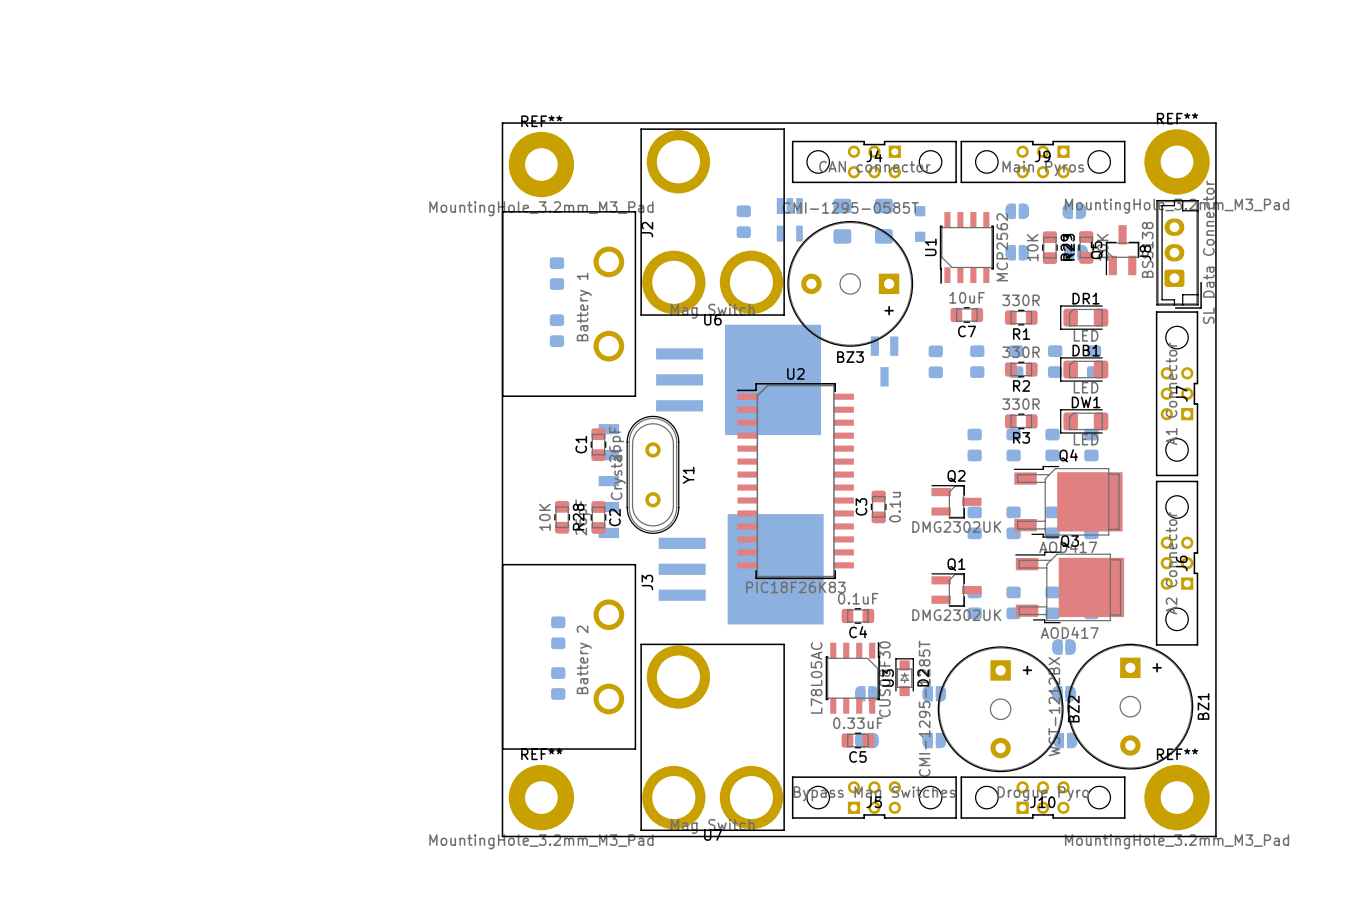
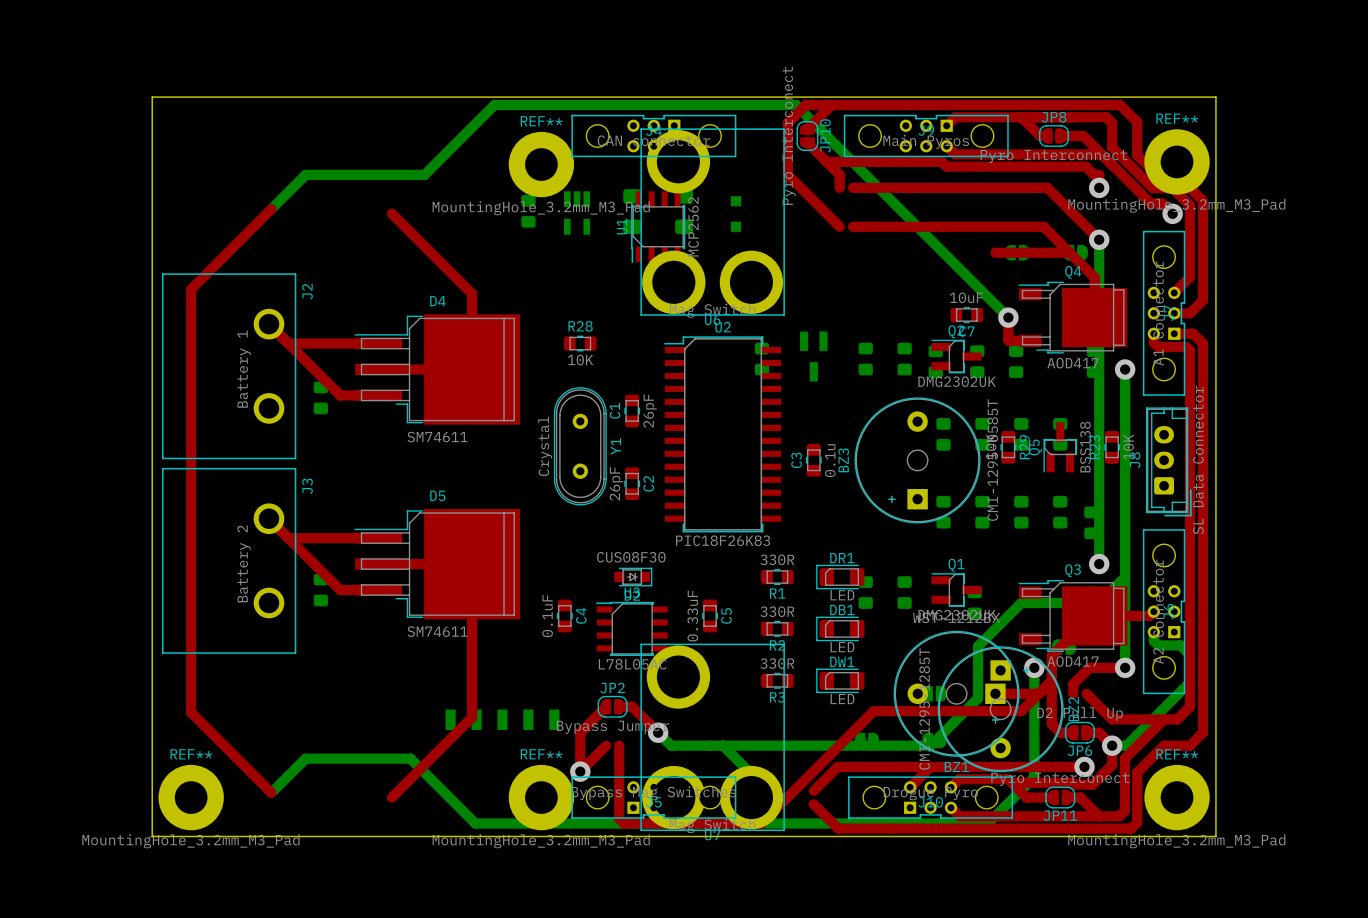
top track: none -> (831, 105) (807, 129)
top track: none -> (1021, 117) (1040, 136) (1047, 136)
board edge: (1215, 123) (502, 123) (502, 836) -> (1215, 123) (1215, 97) (152, 97) (152, 836) (502, 836)
top track: none -> (946, 125) (955, 117) (1106, 117) (1112, 123) (1112, 147) (1152, 188) (1172, 188) (1190, 205) (1190, 277) (1174, 292)
top track: none -> (1060, 136) (1083, 136) (1151, 203) (1162, 203) (1172, 213)
top track: none -> (807, 142) (839, 174) (839, 187)
top track: none -> (946, 146) (954, 154) (1101, 154)
top track: none -> (826, 161) (942, 161) (946, 166) (1085, 166) (1094, 174) (1099, 174) (1099, 187)
J4 position: (874, 161) -> (653, 136)
J9 position: (1043, 161) -> (926, 136)
top track: none -> (853, 187) (1047, 187) (1099, 239)
via: none -> (1099, 187)
top track: none -> (271, 209) (191, 289) (191, 712) (271, 792)
bottom track: none -> (271, 209) (305, 174) (424, 174) (494, 105) (795, 105) (1008, 317)
part: none -> (528, 211)
part: none -> (632, 211)
part: none -> (684, 211)
JP10 side: bottom (1017, 211) -> top (807, 136)
JP8 side: bottom (1074, 211) -> top (1053, 136)
top track: none -> (391, 213) (472, 293) (472, 369) (378, 369)
via: none -> (1172, 213)
part position: (789, 219) -> (577, 213)
part: (743, 221) -> none
part: (842, 221) -> none
part: (883, 221) -> none
part position: (920, 224) -> (735, 214)
top track: none -> (839, 226) (787, 174) (787, 123) (805, 105) (1120, 105) (1137, 122) (1137, 155) (1157, 175) (1177, 175) (1202, 200) (1202, 300) (1190, 313) (1174, 313)
top track: none -> (853, 226) (1043, 226) (1094, 277) (1094, 317)
bottom track: none -> (1099, 239) (1099, 564)
via: none -> (1099, 239)
U1 position: (966, 247) -> (658, 227)
R29 position: (1049, 247) -> (1008, 447)
R23 position: (1086, 247) -> (1112, 447)
Q5 position: (1122, 250) -> (1060, 447)
top track: none -> (995, 252) (1069, 252)
J8 position: (1179, 254) -> (1168, 461)
part: (556, 273) -> none
BZ3 rotation: 0° (850, 283) -> 90° clockwise (917, 460)
BZ3 position: (850, 283) -> (917, 460)
J2 position: (569, 304) -> (229, 366)
top track: none -> (1008, 317) (1008, 340) (1030, 340)
via: none -> (1008, 317)
R1 position: (1021, 317) -> (777, 577)
DR1 position: (1084, 317) -> (840, 577)
top track: none -> (268, 324) (340, 395) (378, 395)
part: (556, 330) -> none
top track: none -> (1153, 333) (1153, 342) (1158, 347) (1186, 347) (1190, 350) (1190, 706) (1177, 719) (1112, 719) (1086, 693)
top track: none -> (1174, 333) (1193, 333) (1202, 343) (1202, 732) (1190, 745) (1164, 745) (1137, 772) (1137, 822) (1131, 828) (838, 828) (813, 804)
top track: none -> (288, 343) (378, 343)
part: none -> (761, 359)
part: none -> (865, 359)
part: none -> (904, 359)
part position: (884, 361) -> (813, 356)
part: (1055, 361) -> none
D4: none -> SM74611 (437, 369)
R2 position: (1021, 369) -> (777, 628)
DB1 position: (1084, 369) -> (840, 628)
bottom track: none -> (1125, 369) (1125, 667)
via: none -> (1125, 369)
part: (738, 379) -> none
J7 position: (1177, 393) -> (1164, 313)
part: none -> (320, 397)
R3 position: (1021, 421) -> (777, 680)
DW1 position: (1084, 421) -> (840, 680)
part: none -> (943, 434)
C1 position: (598, 444) -> (632, 410)
part position: (974, 445) -> (982, 434)
part position: (1013, 445) -> (1021, 434)
part position: (1052, 445) -> (1060, 434)
part: (1091, 445) -> none
Y1 position: (652, 474) -> (580, 446)
part: (608, 481) -> none
U2 position: (795, 481) -> (722, 434)
Q2 position: (956, 501) -> (956, 356)
Q4 position: (1068, 501) -> (1072, 317)
C3 position: (878, 506) -> (813, 460)
part: none -> (943, 512)
R28 value position: 10K (544, 517) -> 10K (580, 360)
R28 rotation: 0° (562, 517) -> 90° clockwise (580, 343)
R28 position: (562, 517) -> (580, 343)
R28 name position: R28 (578, 517) -> R28 (580, 326)
C2 position: (598, 517) -> (632, 483)
top track: none -> (268, 518) (340, 590) (378, 590)
part position: (974, 522) -> (982, 512)
part position: (1013, 522) -> (1021, 512)
part position: (1052, 522) -> (1060, 512)
top track: none -> (288, 538) (378, 538)
J6 position: (1177, 563) -> (1164, 611)
top track: none -> (378, 564) (472, 564) (472, 717) (391, 797)
D5: none -> SM74611 (437, 564)
via: none -> (1099, 564)
part: (741, 569) -> none
bottom track: none -> (1125, 577) (1099, 603) (1021, 603) (978, 646) (978, 698) (930, 745) (671, 745) (658, 732)
Q3 position: (1069, 587) -> (1072, 615)
part: none -> (320, 590)
part: none -> (865, 592)
part: none -> (904, 592)
C4 value position: 0.1uF (858, 598) -> 0.1uF (547, 616)
part: (1013, 602) -> none
part: (1052, 602) -> none
top track: none -> (1153, 611) (1149, 615) (1091, 615) (1051, 655) (1051, 724) (1060, 732) (1073, 732)
C4 rotation: 0° (857, 615) -> 90° clockwise (564, 615)
C4 position: (857, 615) -> (564, 615)
part: (558, 632) -> none
C4 name position: C4 (858, 632) -> C4 (581, 615)
bottom track: none -> (1153, 632) (1153, 640) (1158, 645) (1180, 645) (1190, 654) (1190, 682) (1126, 745) (1112, 745)
J3 position: (569, 656) -> (229, 560)
bottom track: none -> (1034, 667) (1034, 777) (988, 823) (475, 823) (410, 758) (305, 758) (271, 792)
via: none -> (1034, 667)
top track: none -> (1125, 667) (1089, 667) (1073, 684) (1073, 693)
via: none -> (1125, 667)
U3 rotation: 0° (852, 677) -> 90° counterclockwise (631, 628)
U3 position: (852, 677) -> (631, 628)
D2 rotation: 0° (904, 677) -> 90° clockwise (633, 577)
D2 position: (904, 677) -> (633, 577)
top track: none -> (1051, 680) (1021, 711) (873, 711) (761, 823) (624, 823) (619, 818) (619, 745)
part: (558, 683) -> none
JP2 side: bottom (866, 693) -> top (612, 706)
top track: none -> (995, 693) (1038, 693)
JP6 side: bottom (1064, 693) -> top (1079, 732)
top track: none -> (606, 706) (580, 732) (580, 771) (606, 745)
top track: none -> (619, 706) (632, 706) (658, 732)
BZ1 rotation: 0° (1130, 706) -> 90° clockwise (956, 693)
BZ1 position: (1130, 706) -> (956, 693)
part: none -> (502, 719)
top track: none -> (1164, 719) (1124, 758) (1124, 810) (1119, 816) (959, 816) (950, 807)
C5 value position: 0.33uF (858, 723) -> 0.33uF (692, 616)
via: none -> (658, 732)
top track: none -> (1086, 732) (1099, 732) (1112, 745) (1112, 764) (1092, 784) (1073, 784) (1071, 782) (1015, 782) (1013, 784)
C5 rotation: 0° (857, 740) -> 90° clockwise (710, 615)
C5 position: (857, 740) -> (710, 615)
JP11 side: bottom (1065, 740) -> top (1060, 797)
bottom track: none -> (723, 745) (748, 771)
via: none -> (1112, 745)
C5 name position: C5 (857, 756) -> C5 (726, 615)
top track: none -> (930, 766) (910, 787)
top track: none -> (1084, 766) (837, 766) (813, 790)
via: none -> (1084, 766)
via: none -> (580, 771)
top track: none -> (950, 787) (959, 779) (1008, 779) (1026, 797) (1053, 797)
REF**: none -> MountingHole_3.2mm_M3_Pad (191, 797)
J5 position: (874, 797) -> (653, 797)
J10 position: (1043, 797) -> (930, 797)
top track: none -> (1066, 797) (1080, 797) (1099, 816)

